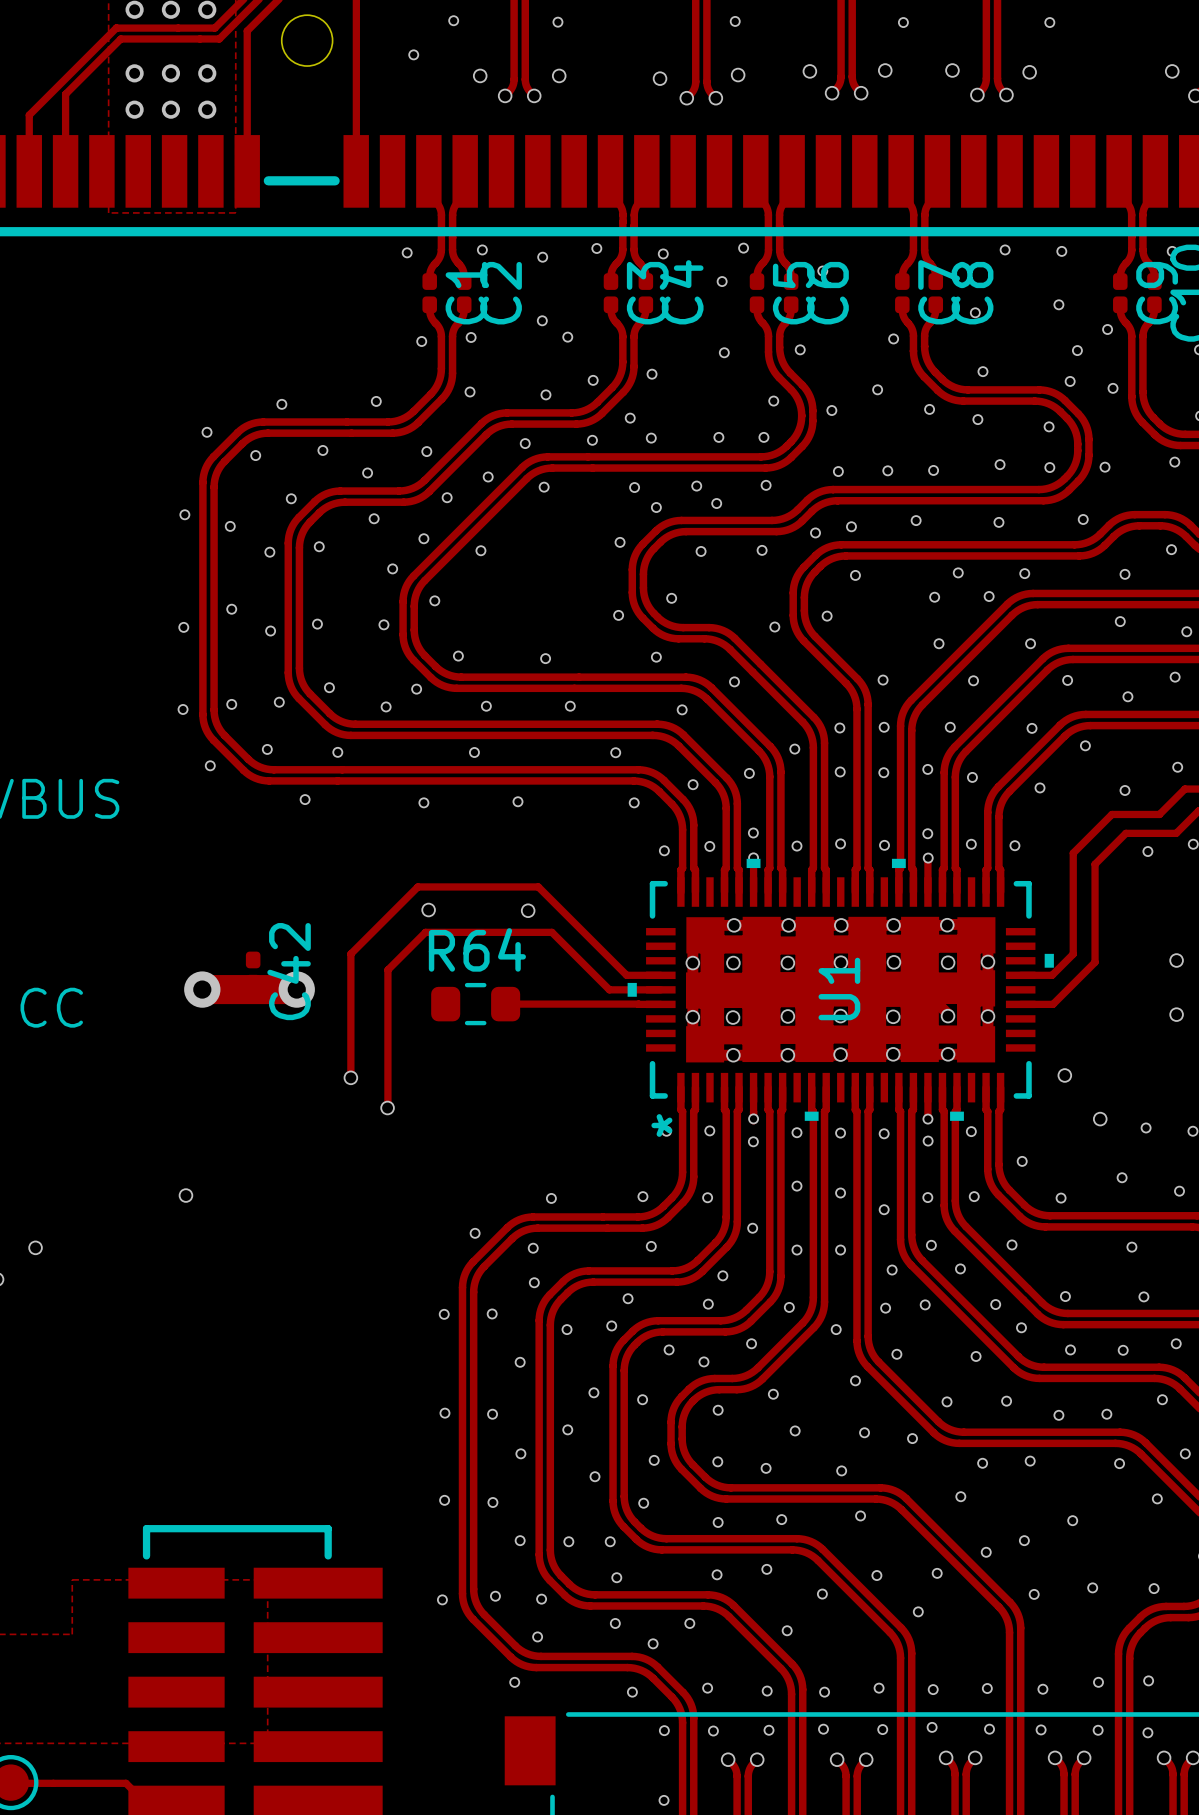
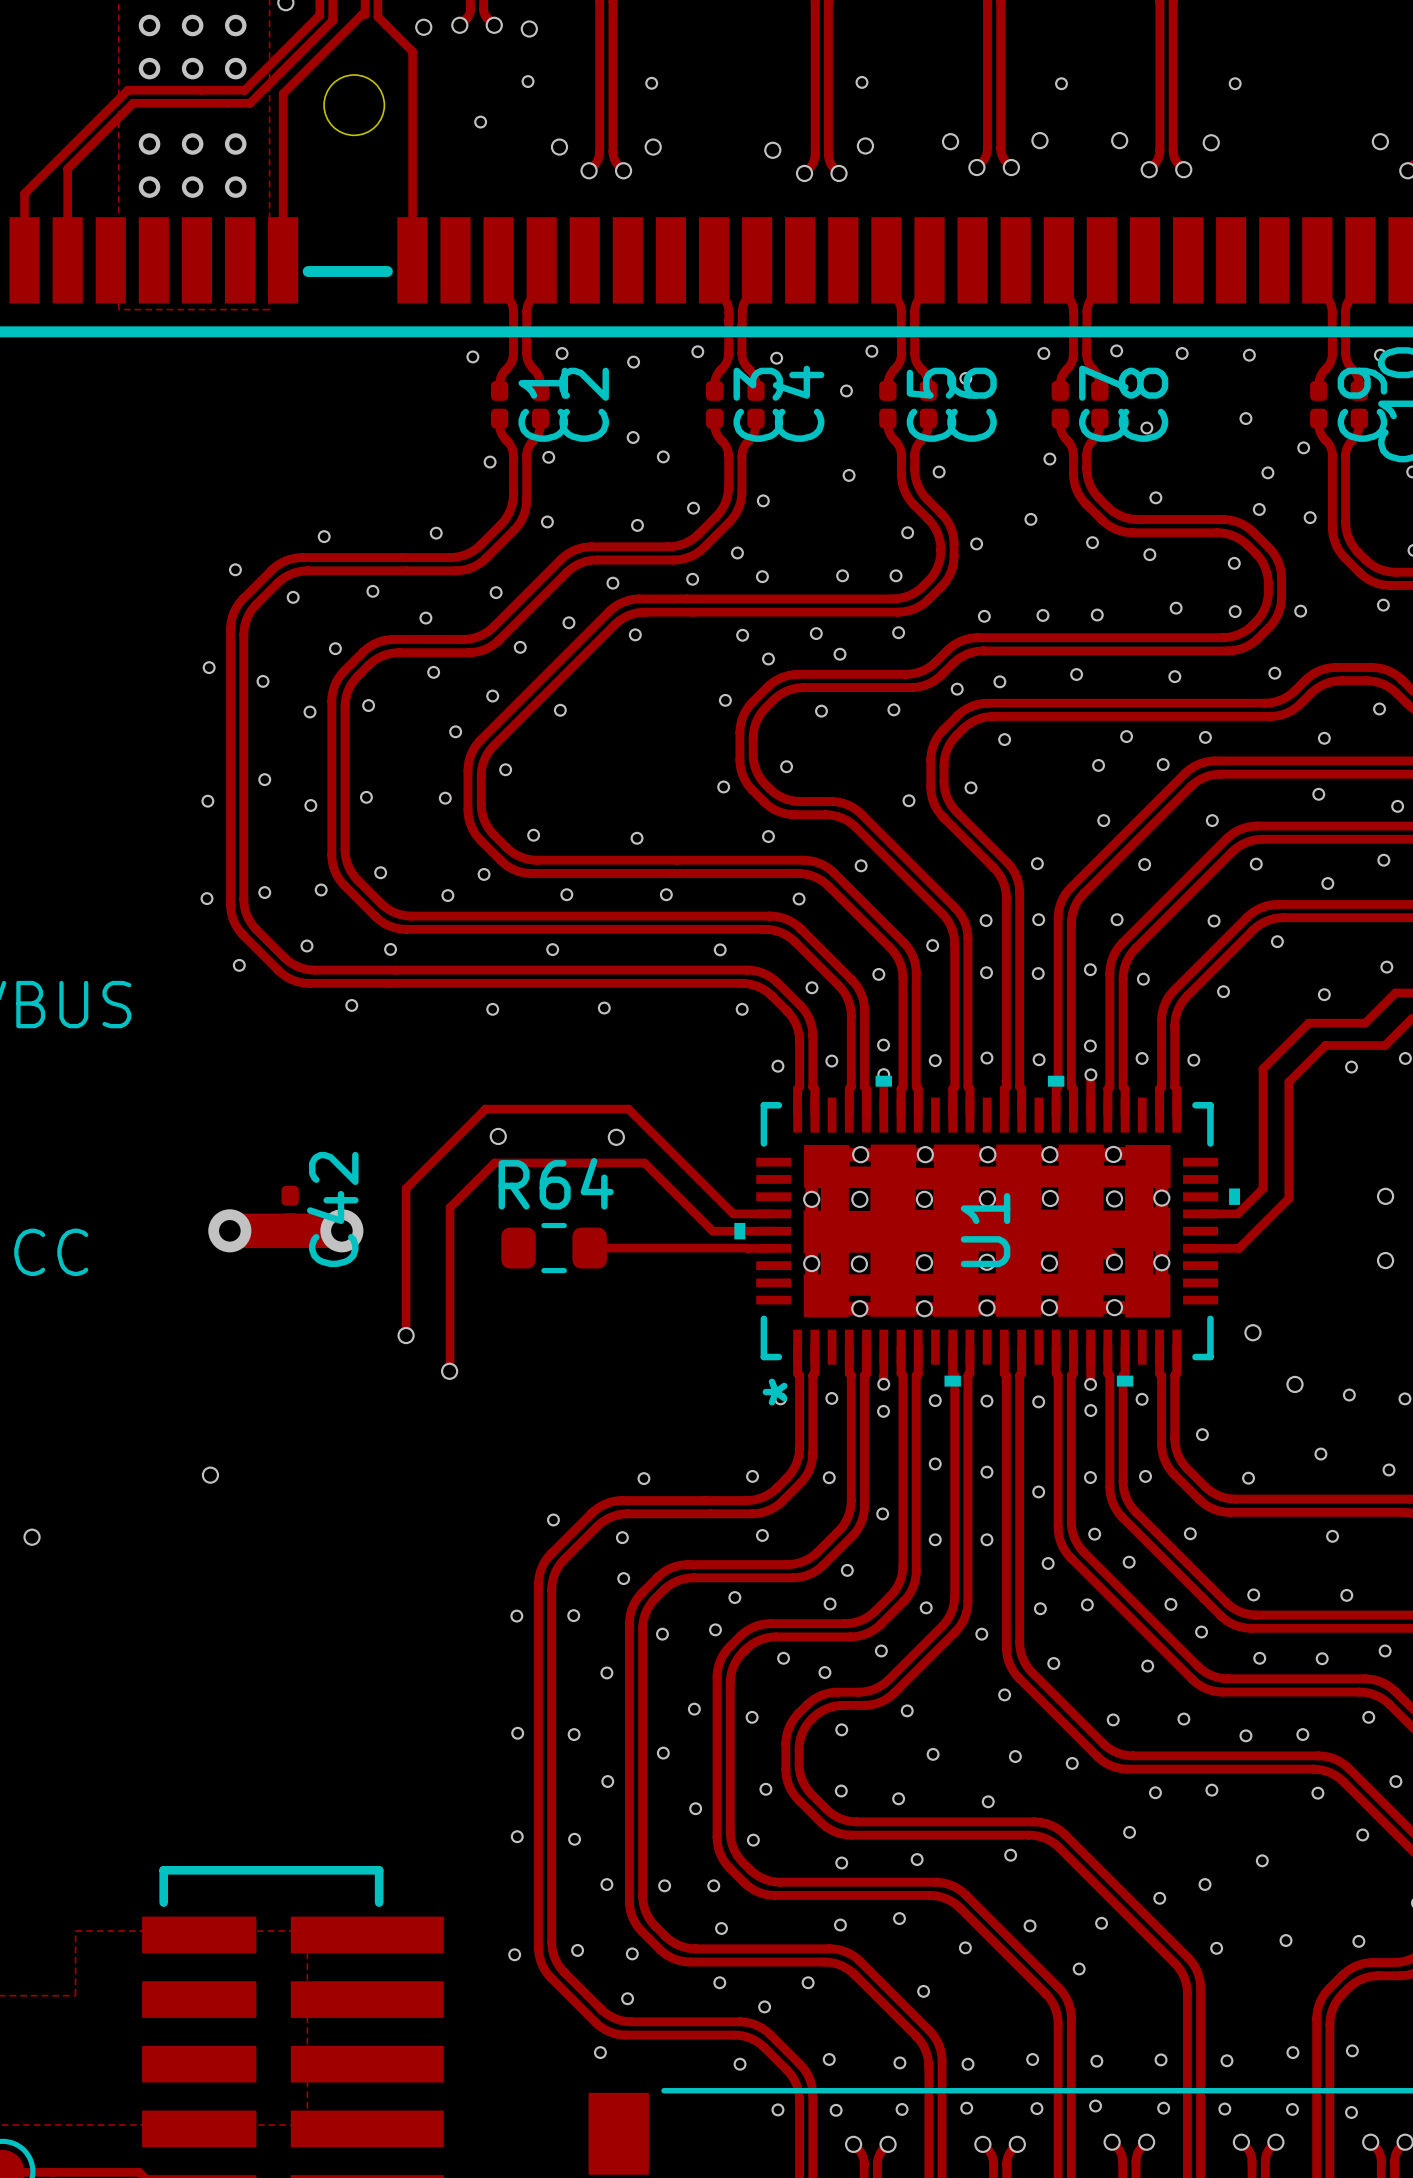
via: none -> (1116, 350)
via: none -> (1043, 353)

